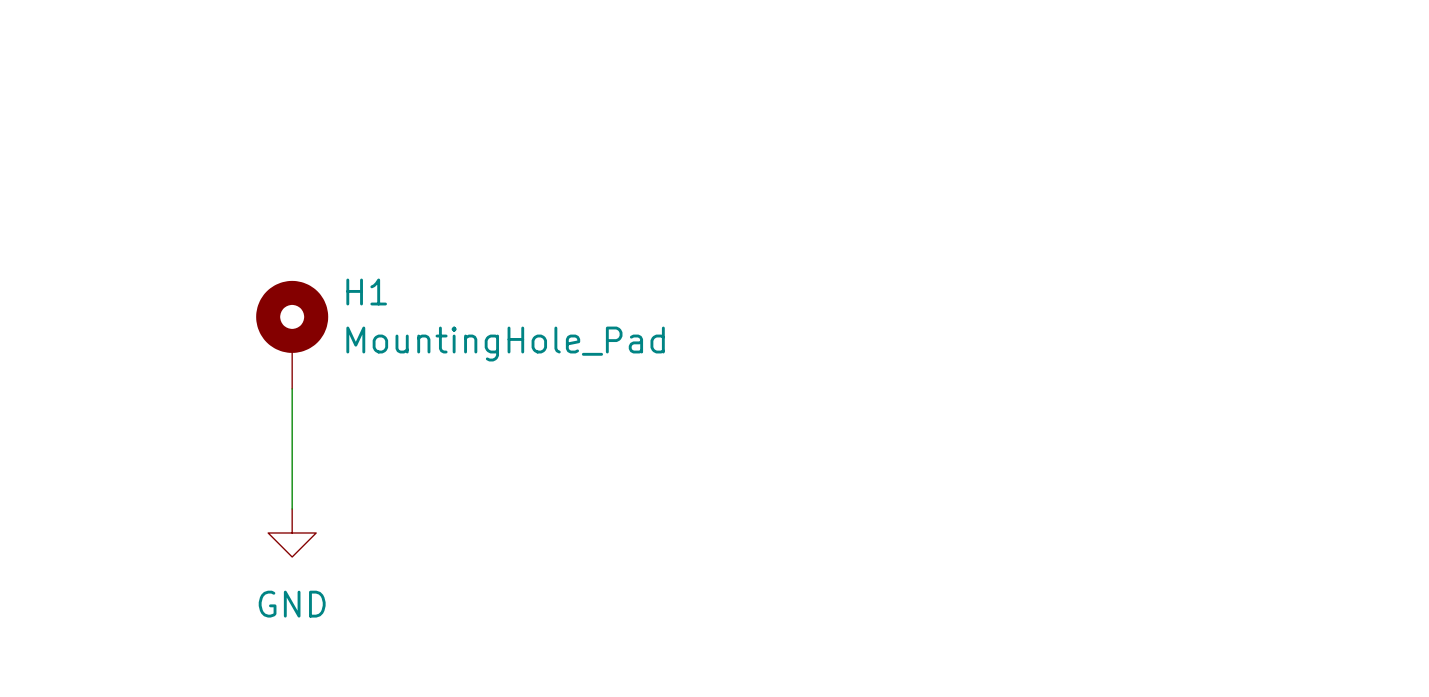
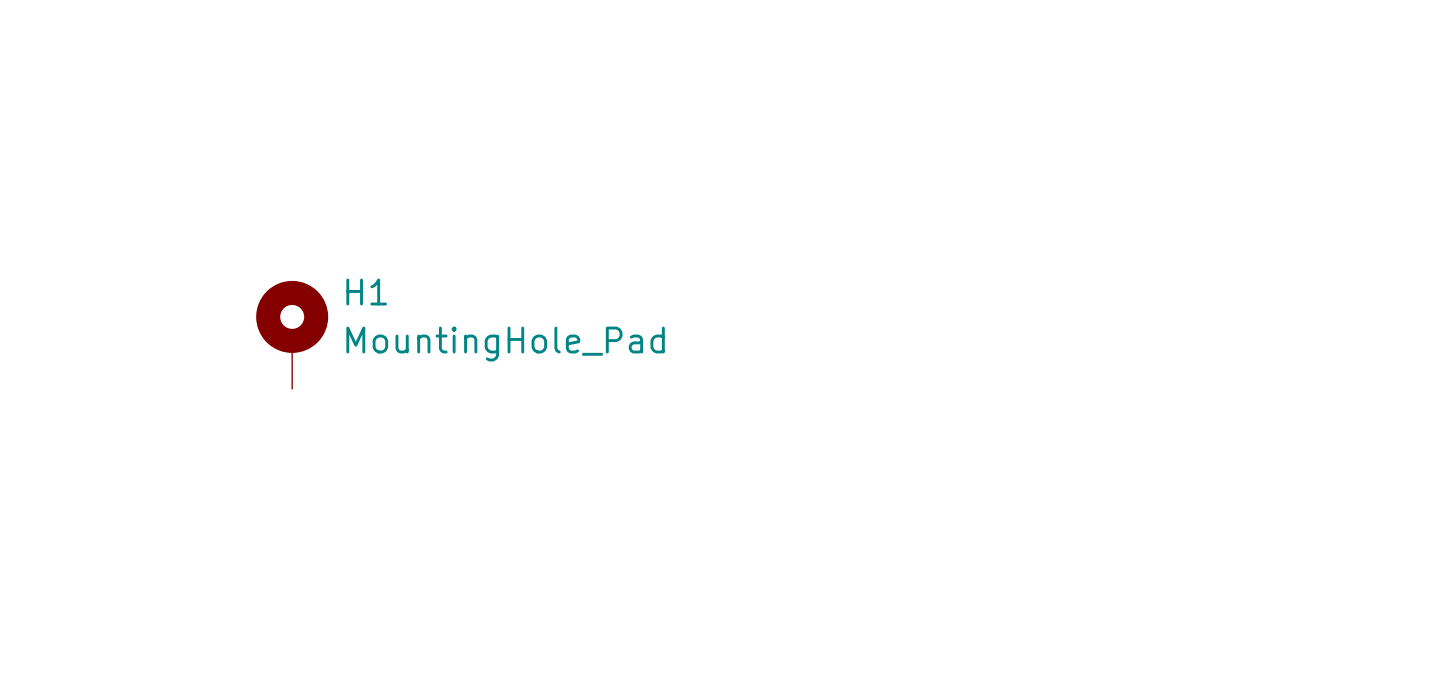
wire: (292, 388) (292, 508) -> none
power symbol: GND (292, 532) -> none

